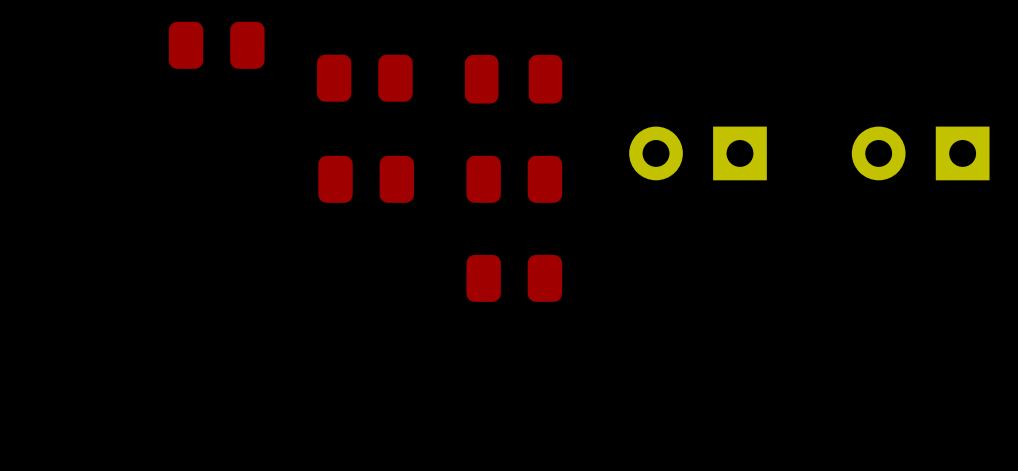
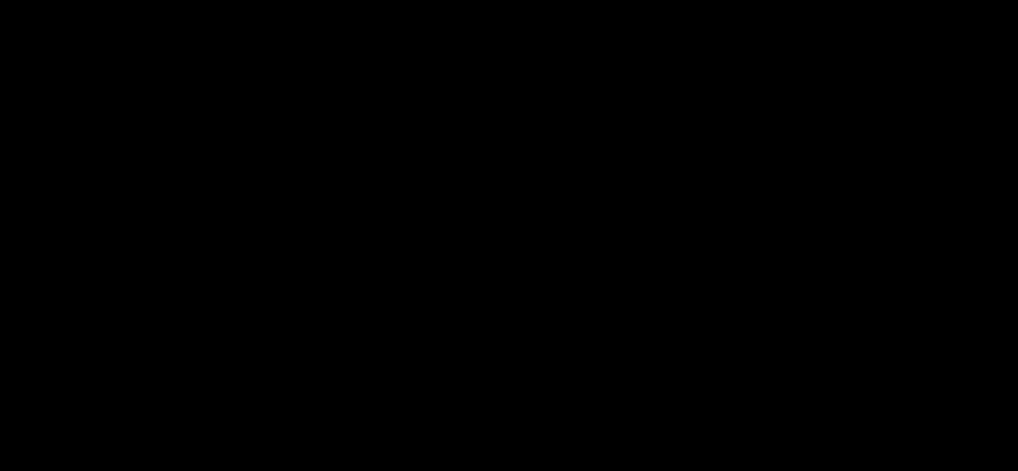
part: (216, 45) -> none
part: (364, 78) -> none
part: (513, 79) -> none
part: (698, 153) -> none
part: (920, 153) -> none
part: (366, 179) -> none
part: (514, 179) -> none
part: (514, 278) -> none

